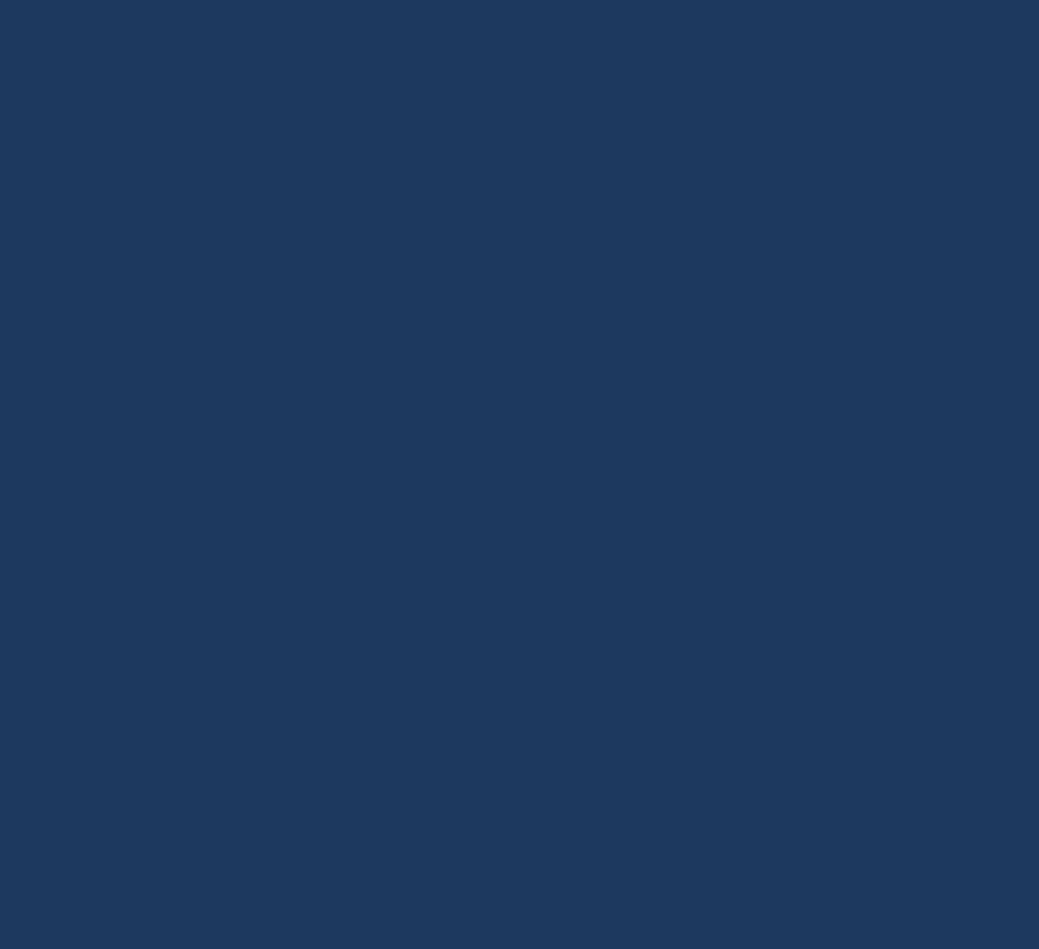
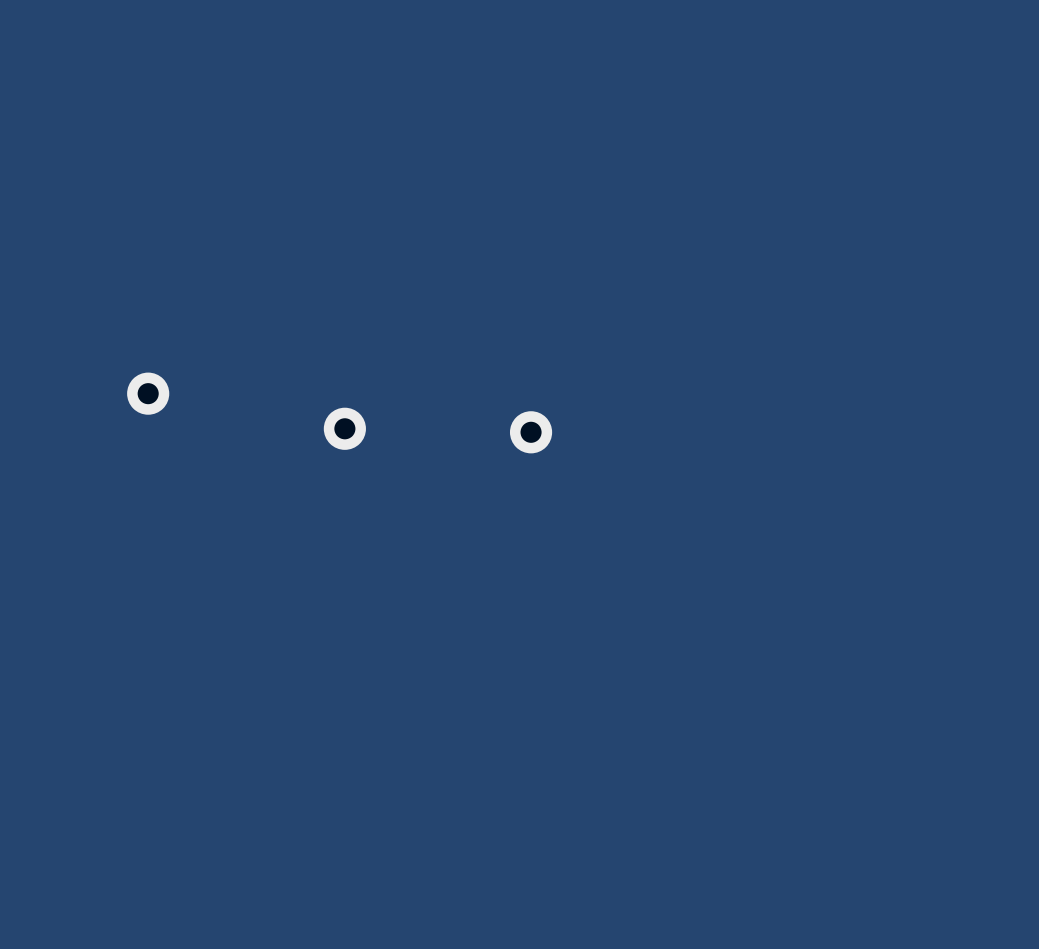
via: none -> (148, 393)
via: none -> (344, 428)
via: none -> (531, 432)

